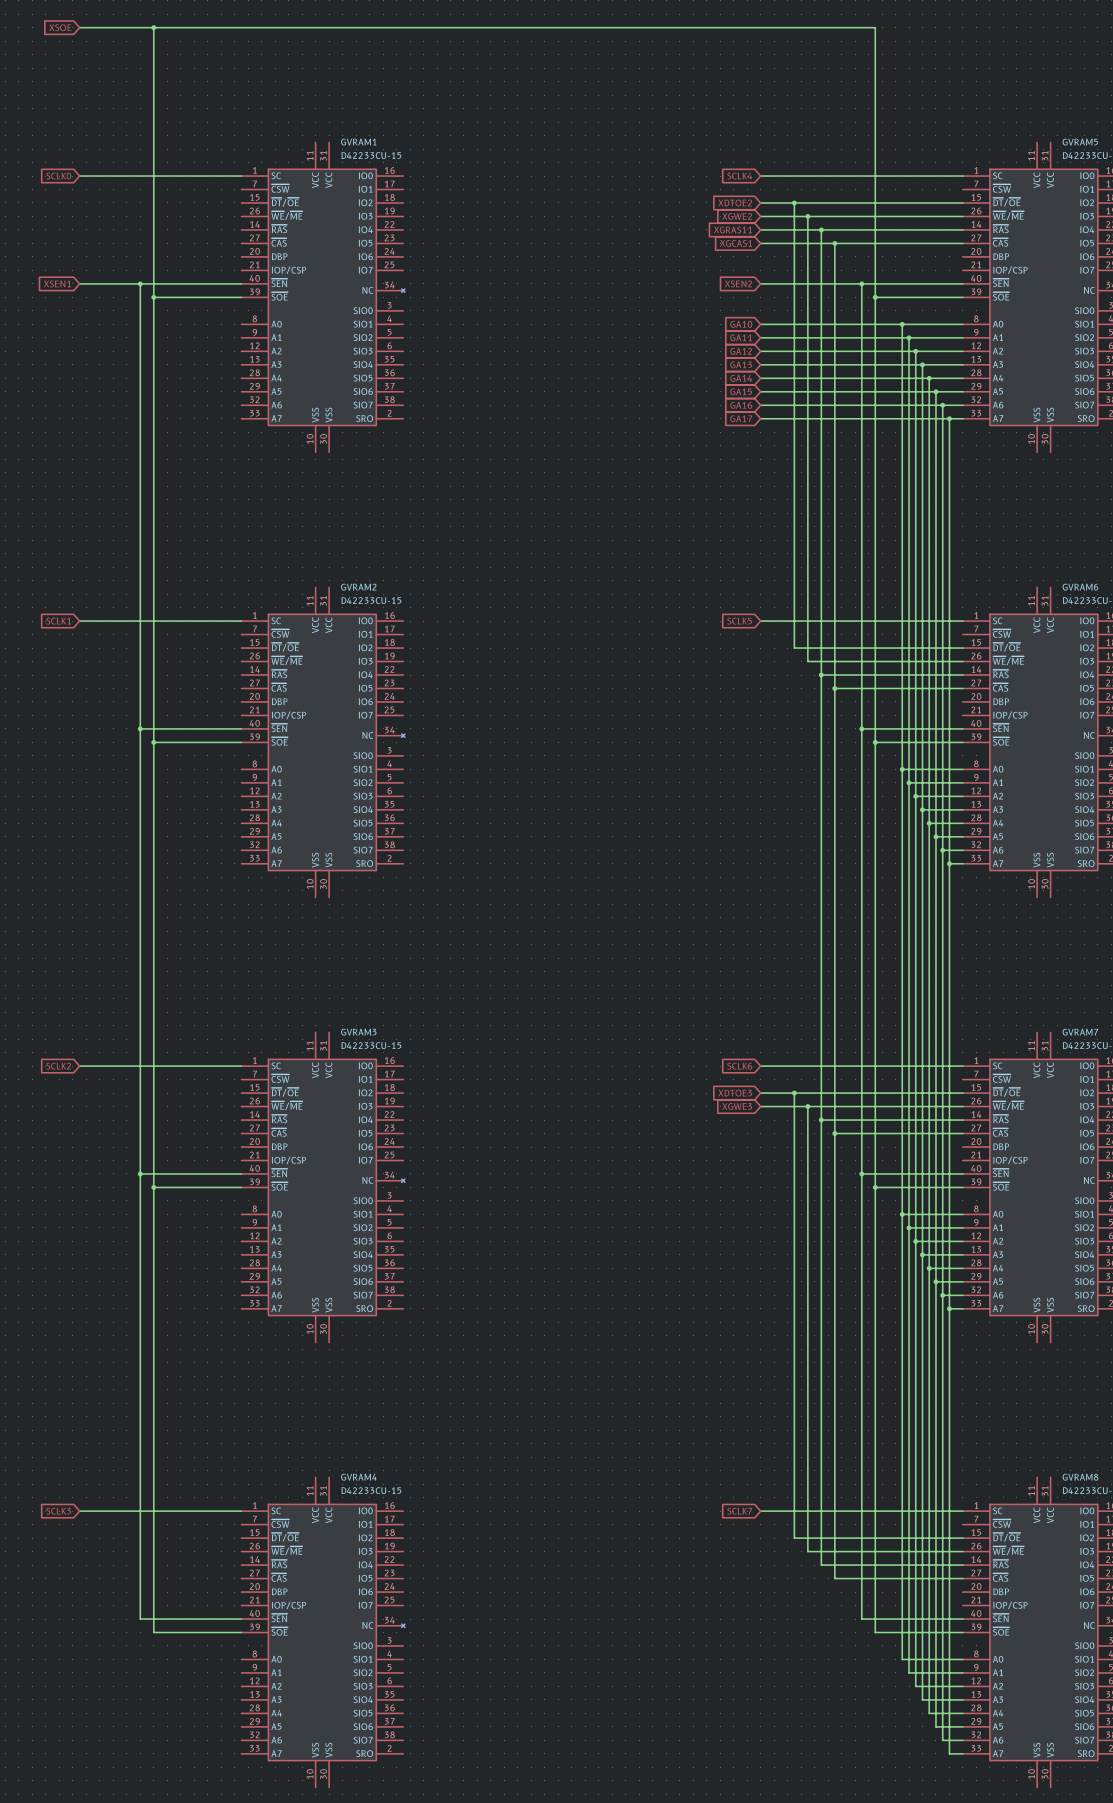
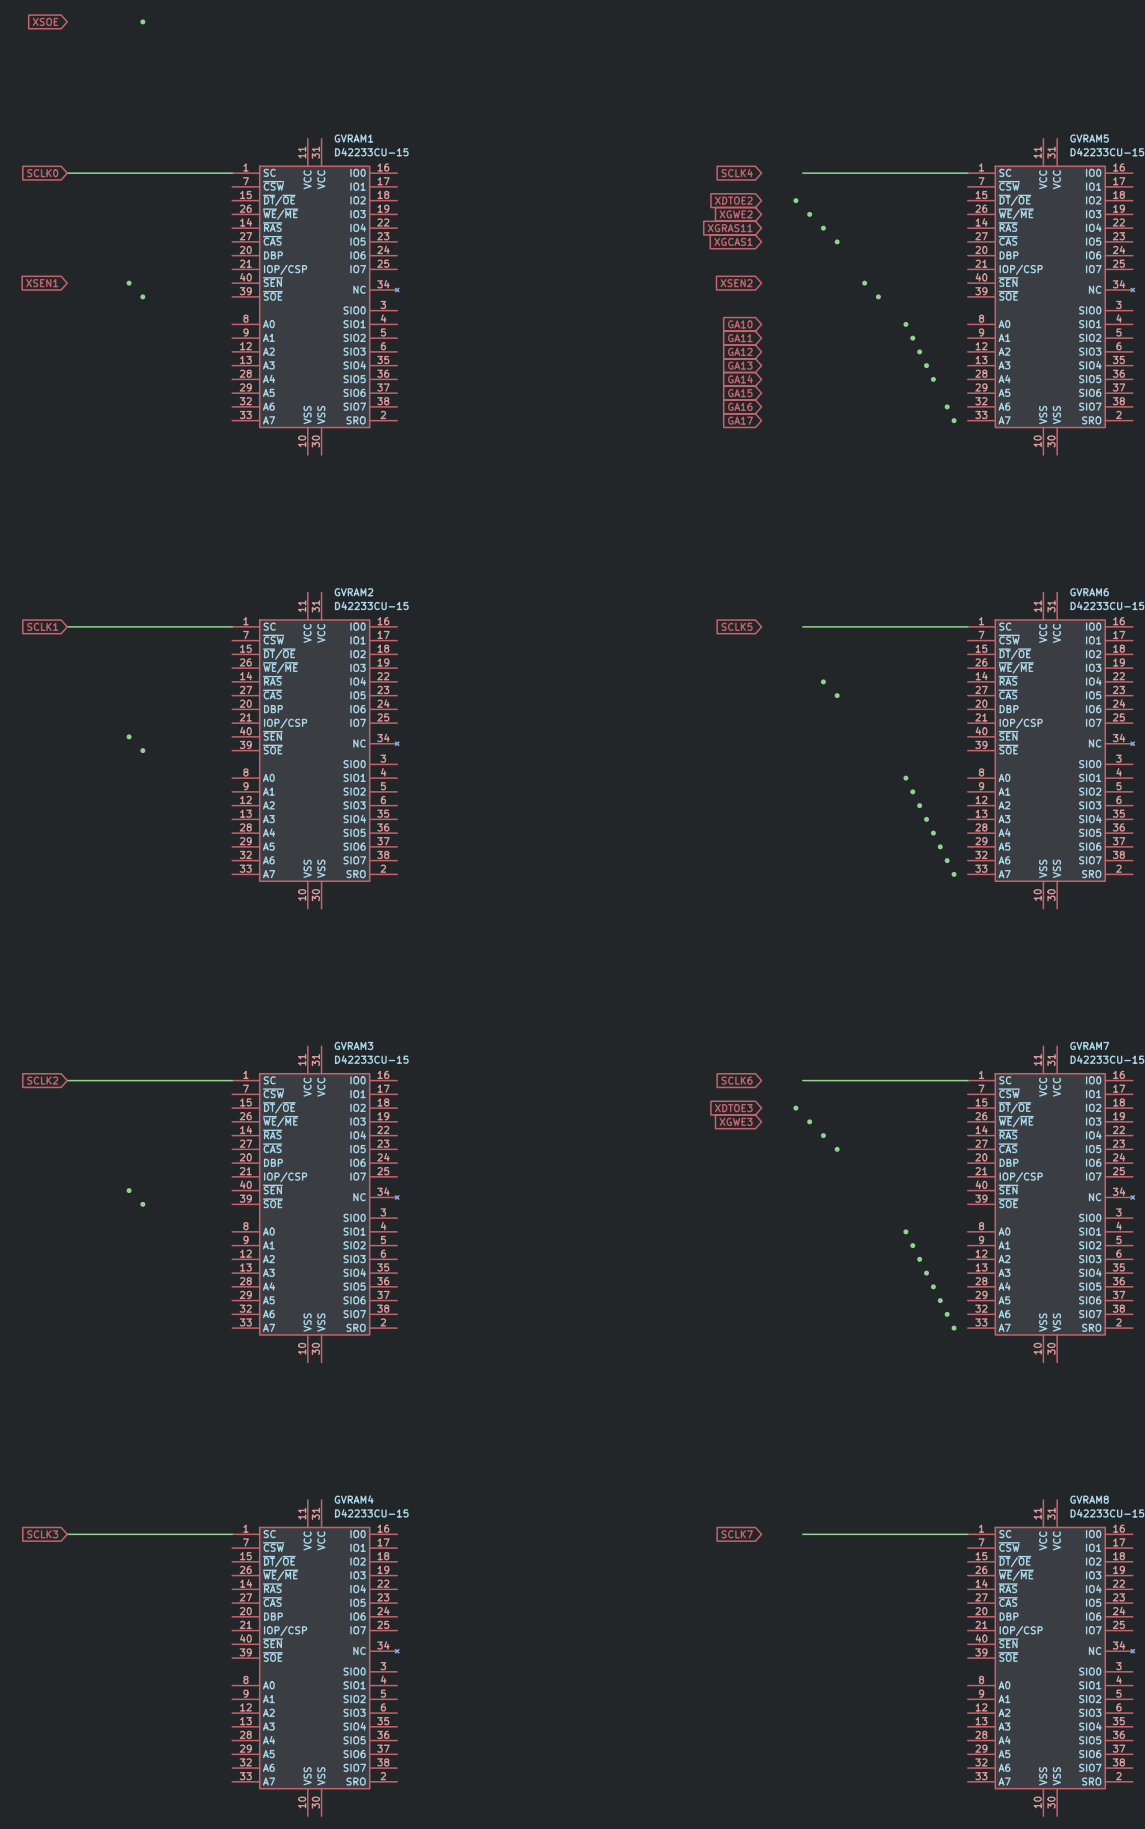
wire: (79, 27) (875, 27) (875, 1632) (962, 1632) -> none
wire: (153, 27) (153, 1632) (241, 1632) -> none
wire: (760, 176) (801, 176) -> none
wire: (760, 202) (962, 202) -> none
wire: (794, 202) (794, 648) (962, 648) -> none
wire: (760, 216) (962, 216) -> none
wire: (807, 216) (807, 661) (962, 661) -> none
wire: (760, 229) (962, 229) -> none
wire: (821, 229) (821, 1565) (962, 1565) -> none
wire: (760, 243) (962, 243) -> none
wire: (834, 243) (834, 1578) (962, 1578) -> none
wire: (79, 283) (241, 283) -> none
wire: (140, 283) (140, 1619) (241, 1619) -> none
wire: (760, 283) (962, 283) -> none
wire: (861, 283) (861, 1619) (962, 1619) -> none
wire: (153, 297) (241, 297) -> none
wire: (875, 297) (962, 297) -> none
wire: (760, 324) (962, 324) -> none
wire: (902, 324) (902, 1659) (962, 1659) -> none
wire: (760, 337) (962, 337) -> none
wire: (909, 337) (909, 1672) (962, 1672) -> none
wire: (760, 351) (962, 351) -> none
wire: (915, 351) (915, 1686) (962, 1686) -> none
wire: (760, 364) (962, 364) -> none
wire: (922, 364) (922, 1699) (962, 1699) -> none
wire: (760, 378) (962, 378) -> none
wire: (929, 378) (929, 1713) (962, 1713) -> none
wire: (760, 391) (962, 391) -> none
wire: (935, 391) (935, 1726) (962, 1726) -> none
junction: (935, 391) -> none
wire: (760, 405) (962, 405) -> none
wire: (942, 405) (942, 1740) (962, 1740) -> none
wire: (760, 418) (962, 418) -> none
wire: (949, 418) (949, 1753) (962, 1753) -> none
wire: (760, 621) (801, 621) -> none
wire: (821, 675) (962, 675) -> none
wire: (834, 688) (962, 688) -> none
wire: (140, 728) (241, 728) -> none
wire: (861, 728) (962, 728) -> none
junction: (861, 728) -> none
wire: (153, 742) (241, 742) -> none
wire: (875, 742) (962, 742) -> none
junction: (875, 742) -> none
wire: (902, 769) (962, 769) -> none
wire: (909, 782) (962, 782) -> none
wire: (915, 796) (962, 796) -> none
wire: (922, 809) (962, 809) -> none
wire: (929, 823) (962, 823) -> none
wire: (935, 836) (962, 836) -> none
wire: (942, 850) (962, 850) -> none
wire: (949, 863) (962, 863) -> none
wire: (760, 1066) (801, 1066) -> none
wire: (760, 1093) (962, 1093) -> none
wire: (794, 1093) (794, 1538) (962, 1538) -> none
wire: (760, 1106) (962, 1106) -> none
wire: (807, 1106) (807, 1551) (962, 1551) -> none
wire: (821, 1120) (962, 1120) -> none
wire: (834, 1133) (962, 1133) -> none
wire: (140, 1173) (241, 1173) -> none
wire: (861, 1173) (962, 1173) -> none
junction: (861, 1173) -> none
wire: (153, 1187) (241, 1187) -> none
wire: (875, 1187) (962, 1187) -> none
junction: (875, 1187) -> none
wire: (902, 1214) (962, 1214) -> none
wire: (909, 1227) (962, 1227) -> none
wire: (915, 1241) (962, 1241) -> none
wire: (922, 1254) (962, 1254) -> none
wire: (929, 1268) (962, 1268) -> none
wire: (935, 1281) (962, 1281) -> none
wire: (942, 1295) (962, 1295) -> none
wire: (949, 1308) (962, 1308) -> none
wire: (760, 1511) (801, 1511) -> none

